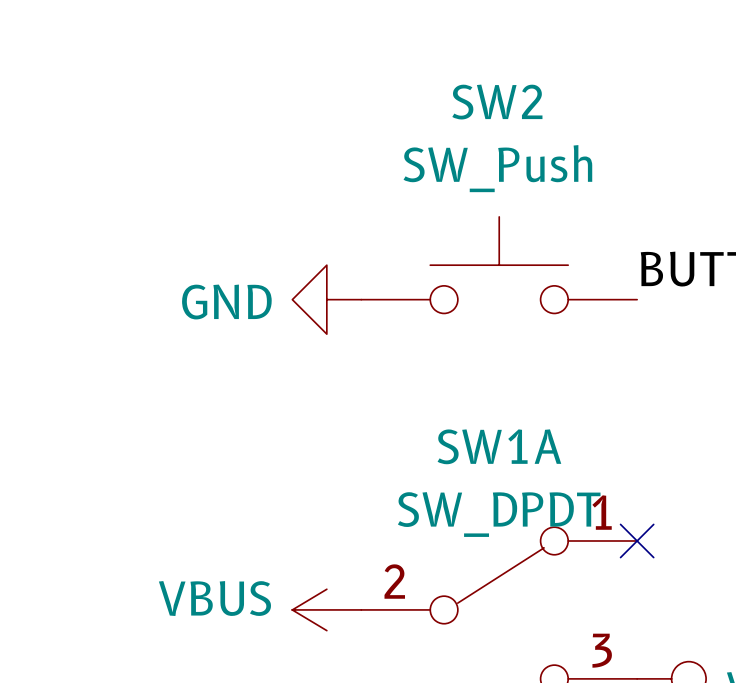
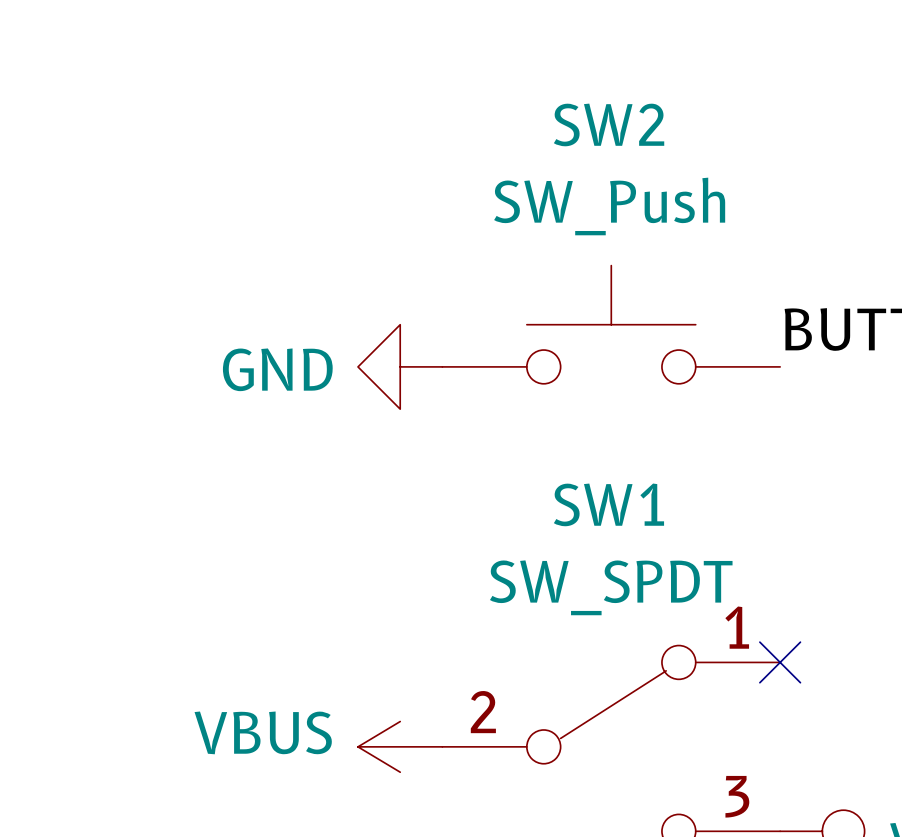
SW1A name: SW1A (499, 446) -> SW1 (608, 504)
SW1A value: SW_DPDT (499, 514) -> SW_SPDT (611, 587)

